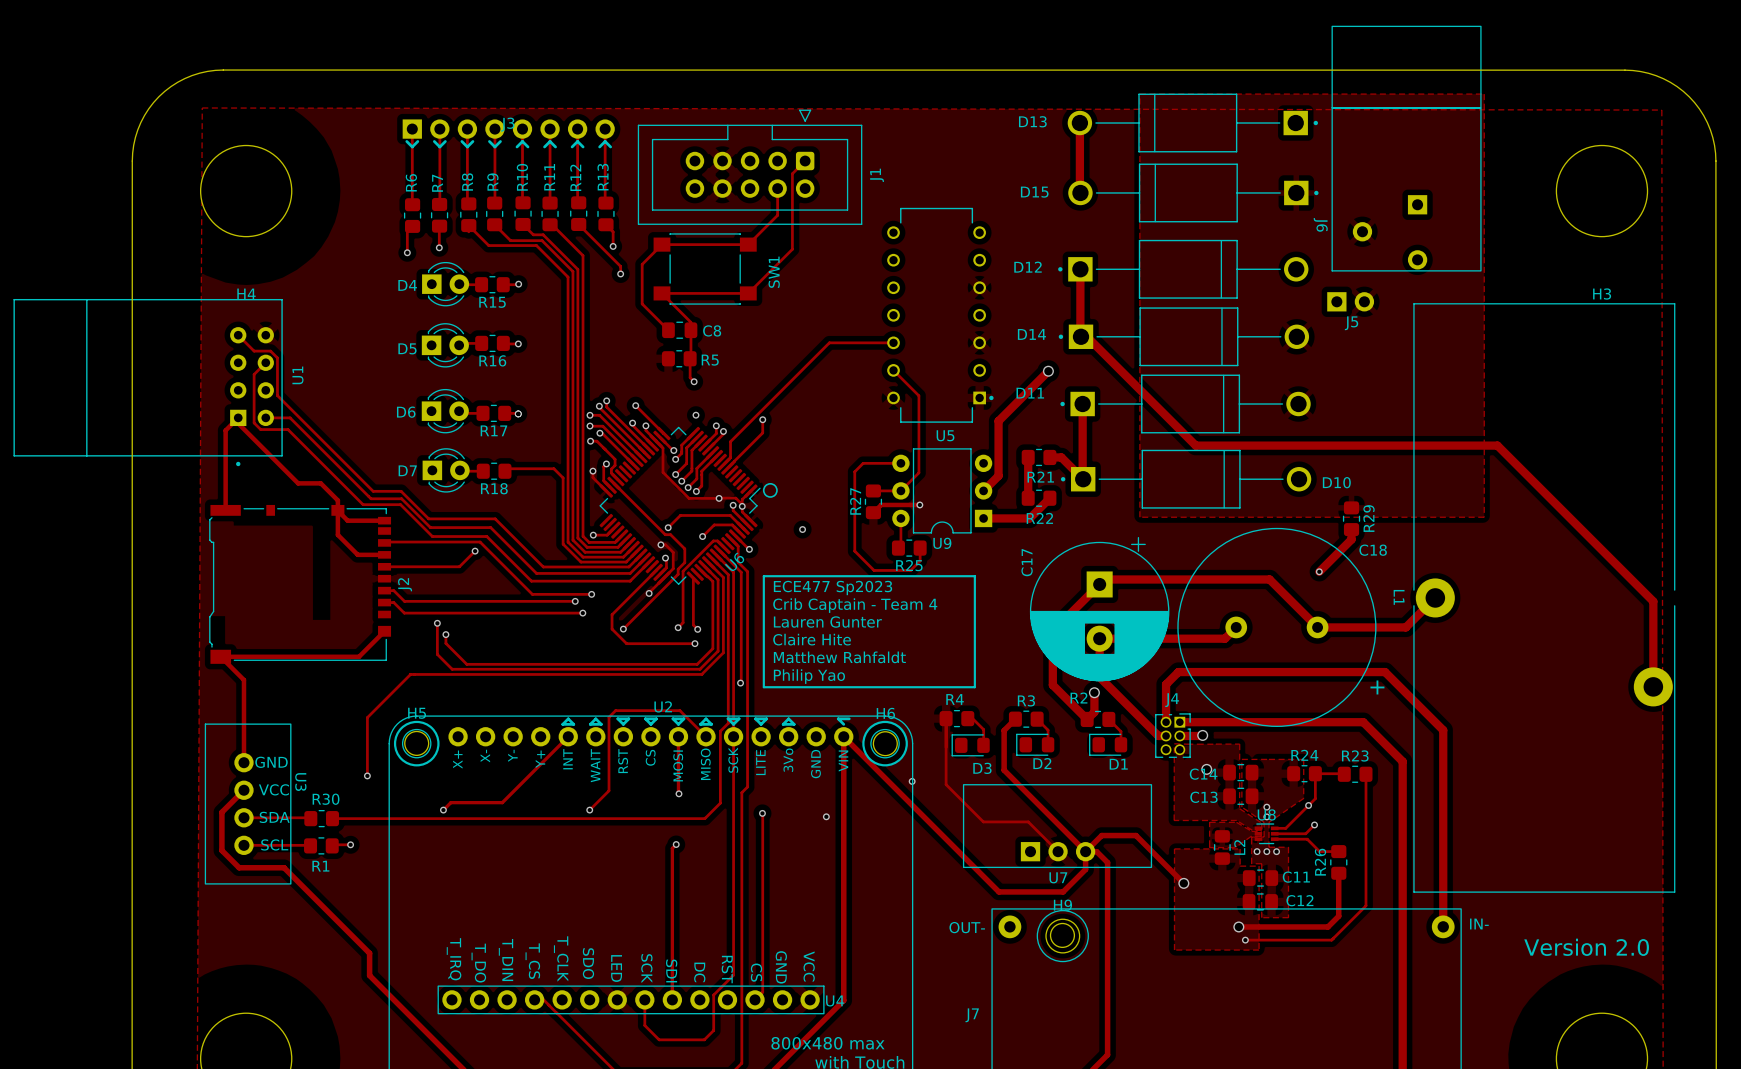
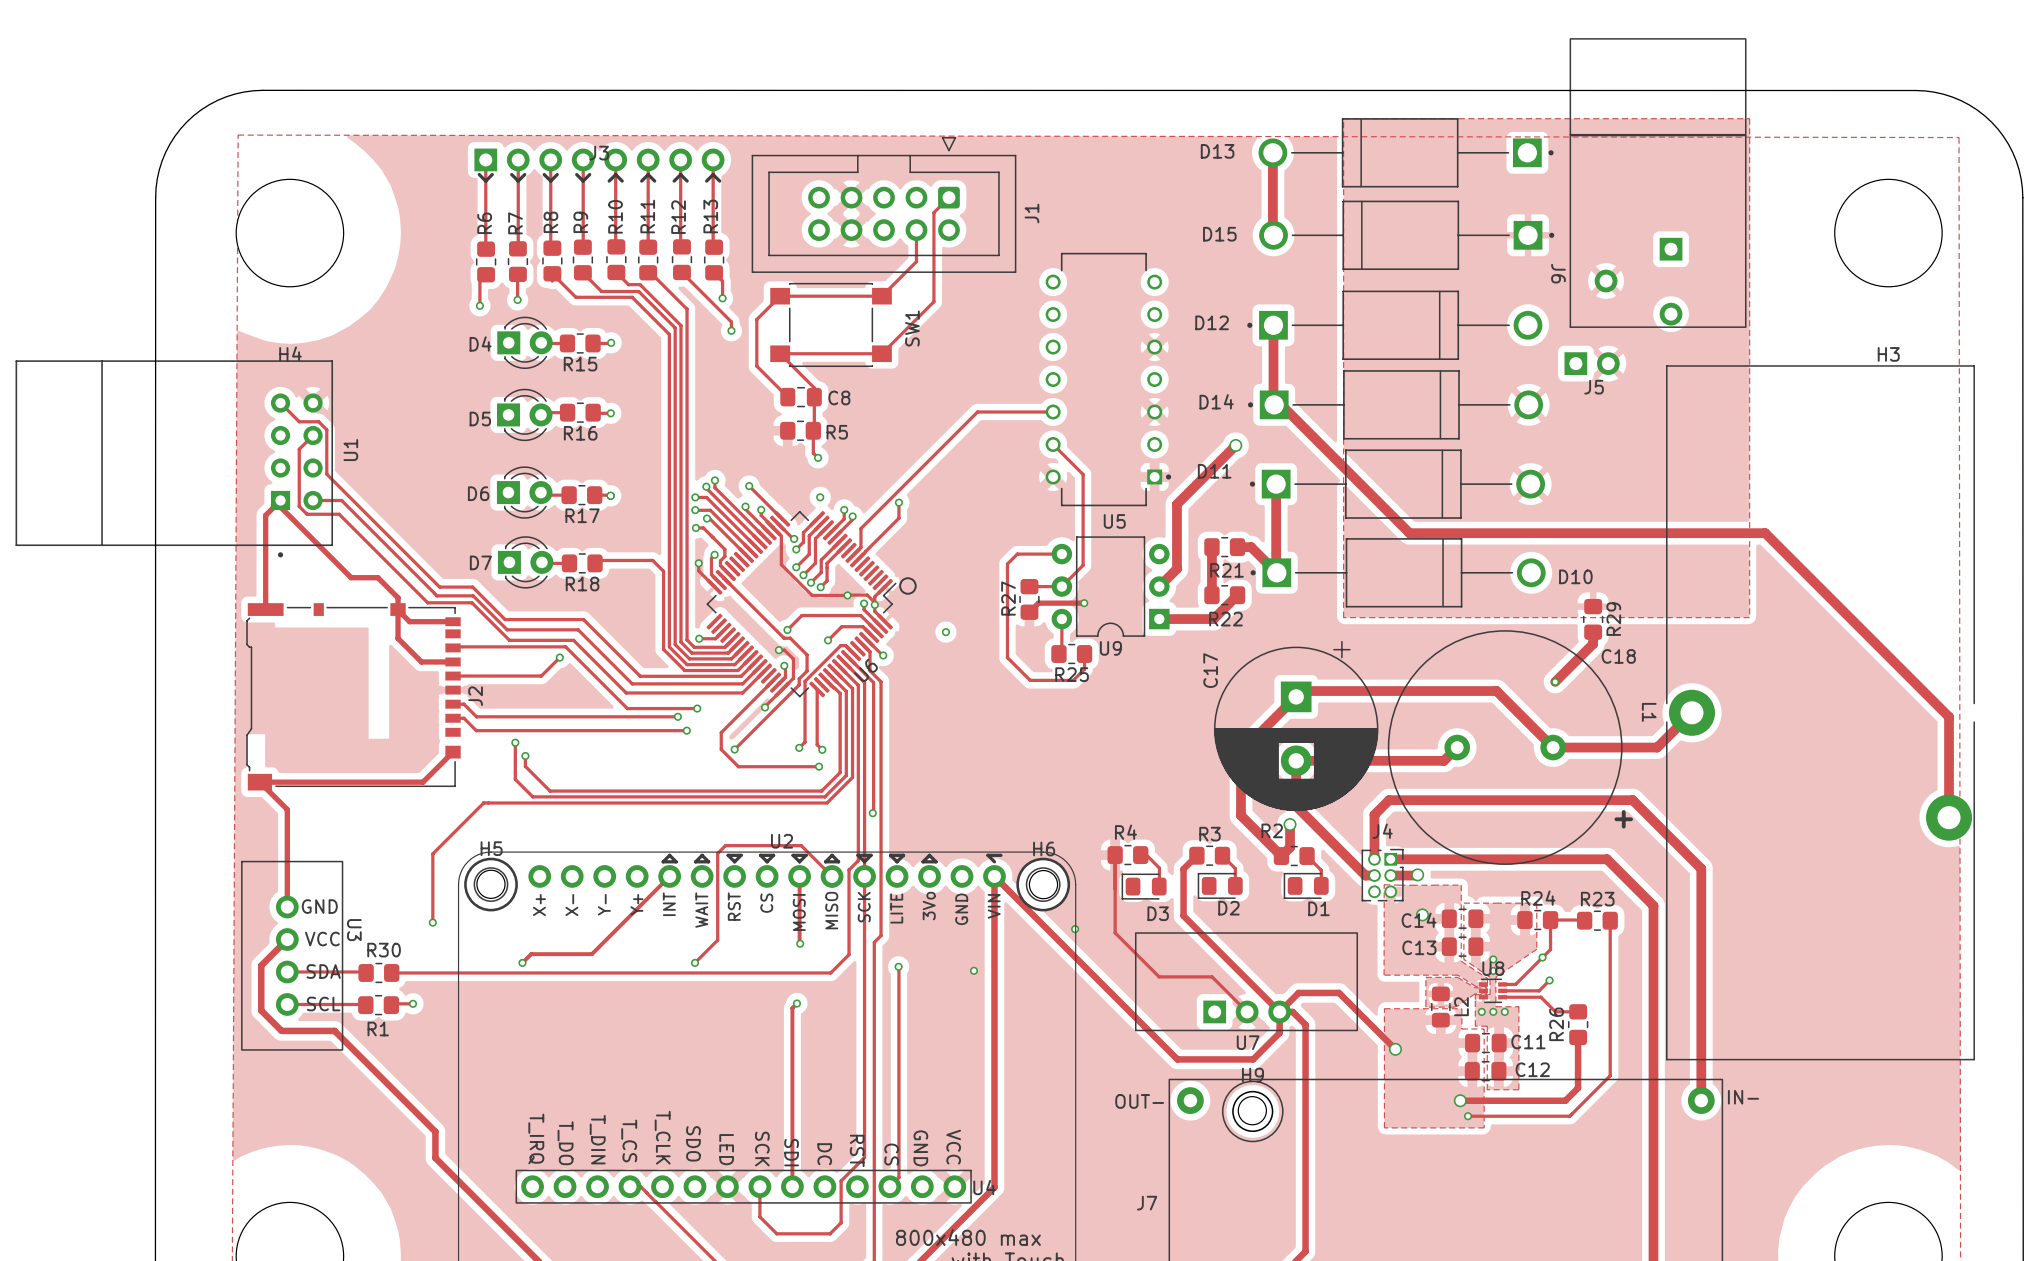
line: (763, 576) (974, 576) (974, 687) (763, 687) (763, 576) -> none
text: ECE477 Sp2023 (832, 587) -> none
text: Crib Captain - Team 4 (855, 605) -> none
text: Lauren Gunter (827, 622) -> none
text: Claire Hite (812, 639) -> none
text: Matthew Rahfaldt (839, 657) -> none
text: Philip Yao (809, 676) -> none
text: Version 2.0 (1586, 947) -> none

